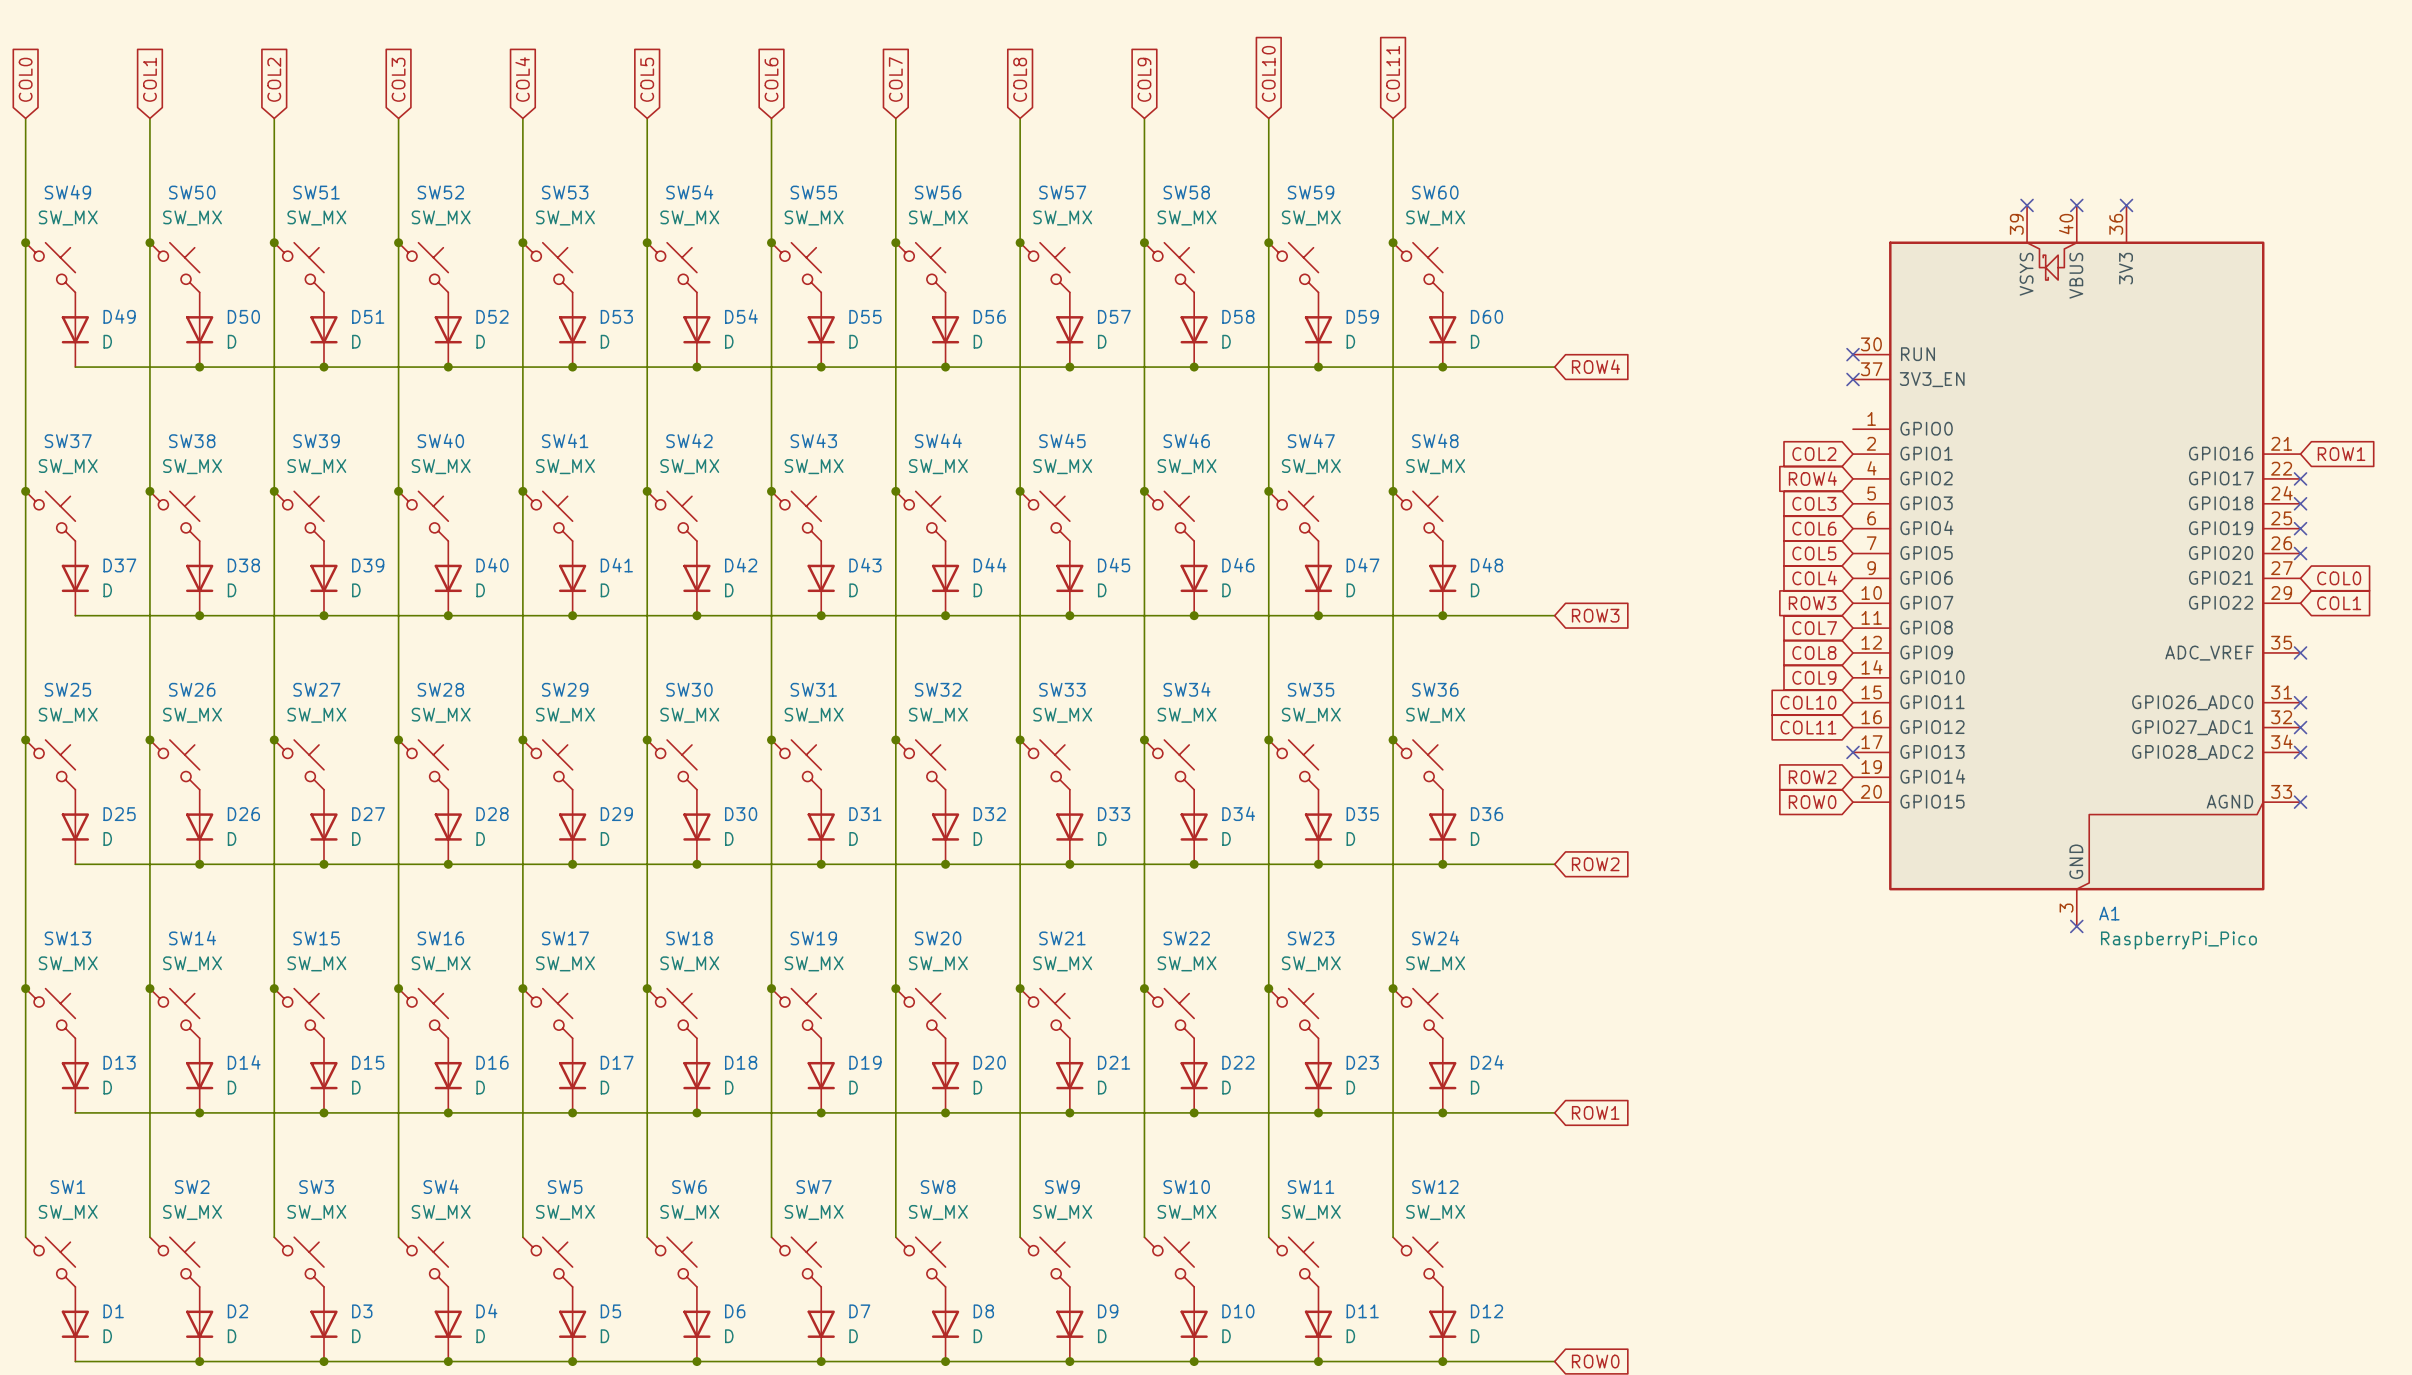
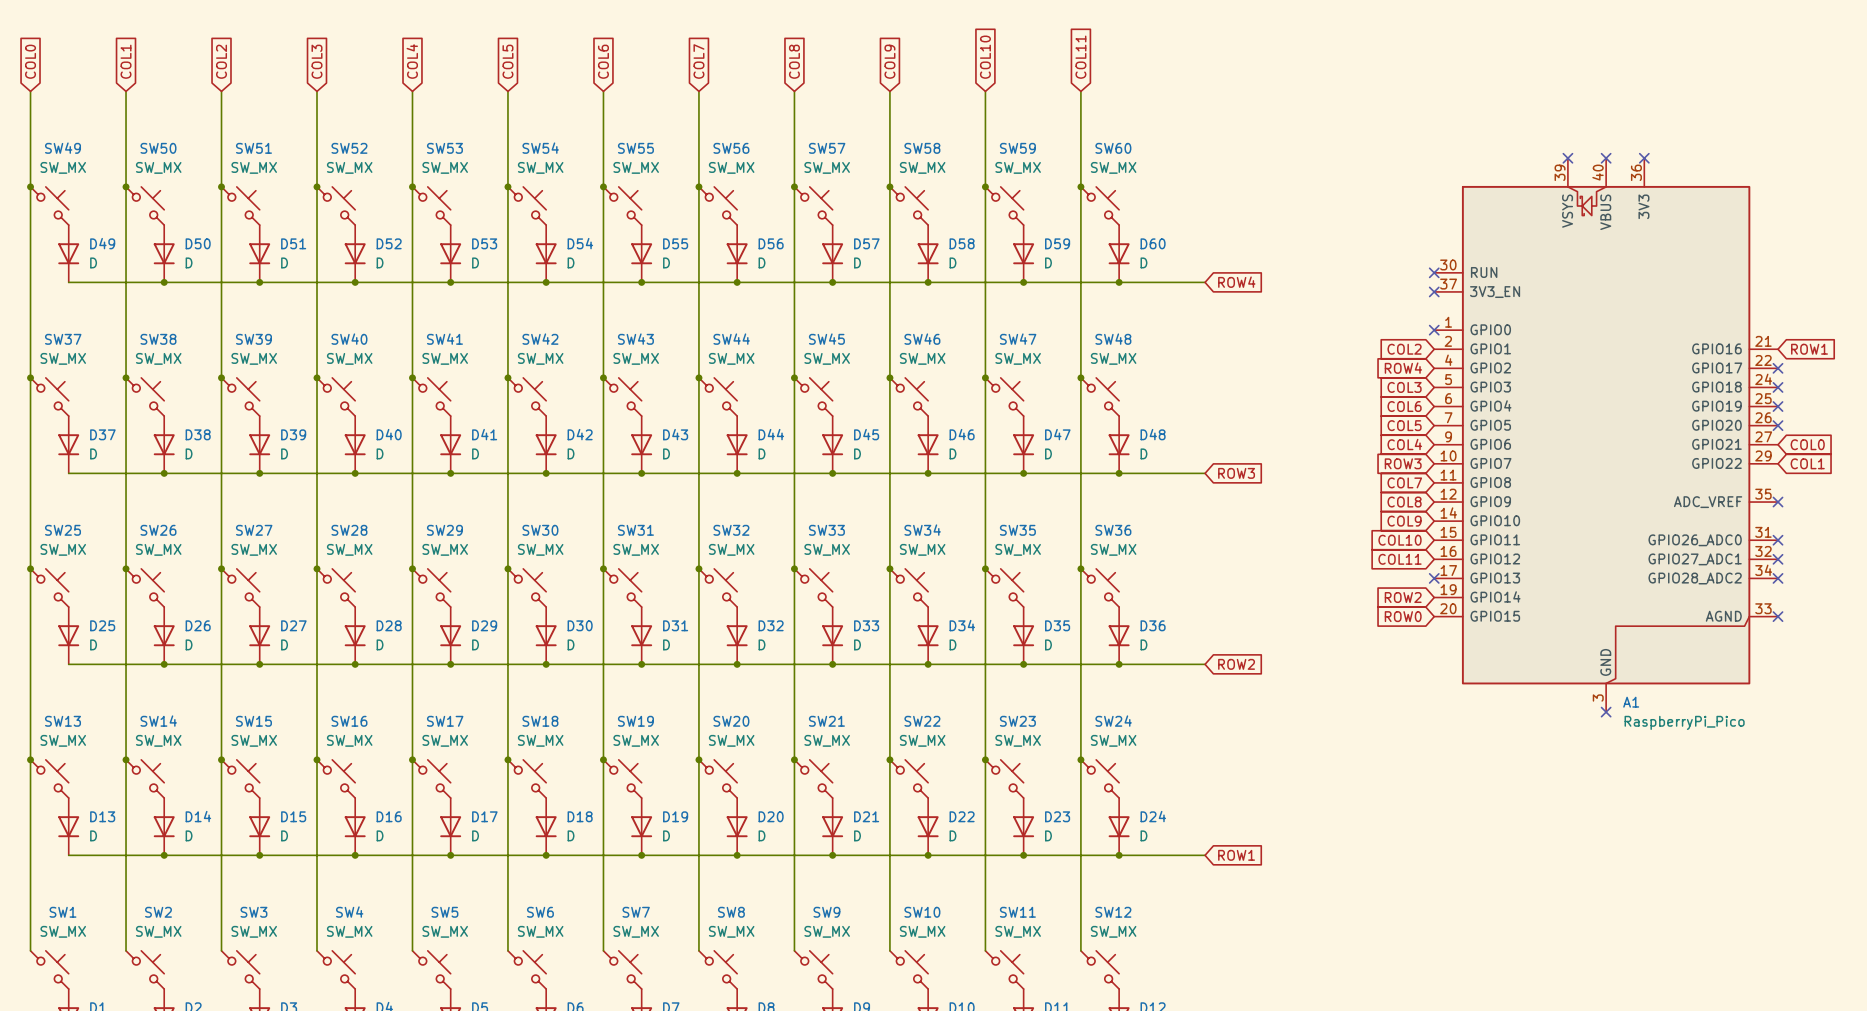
no-connect mark: none -> (1434, 330)

